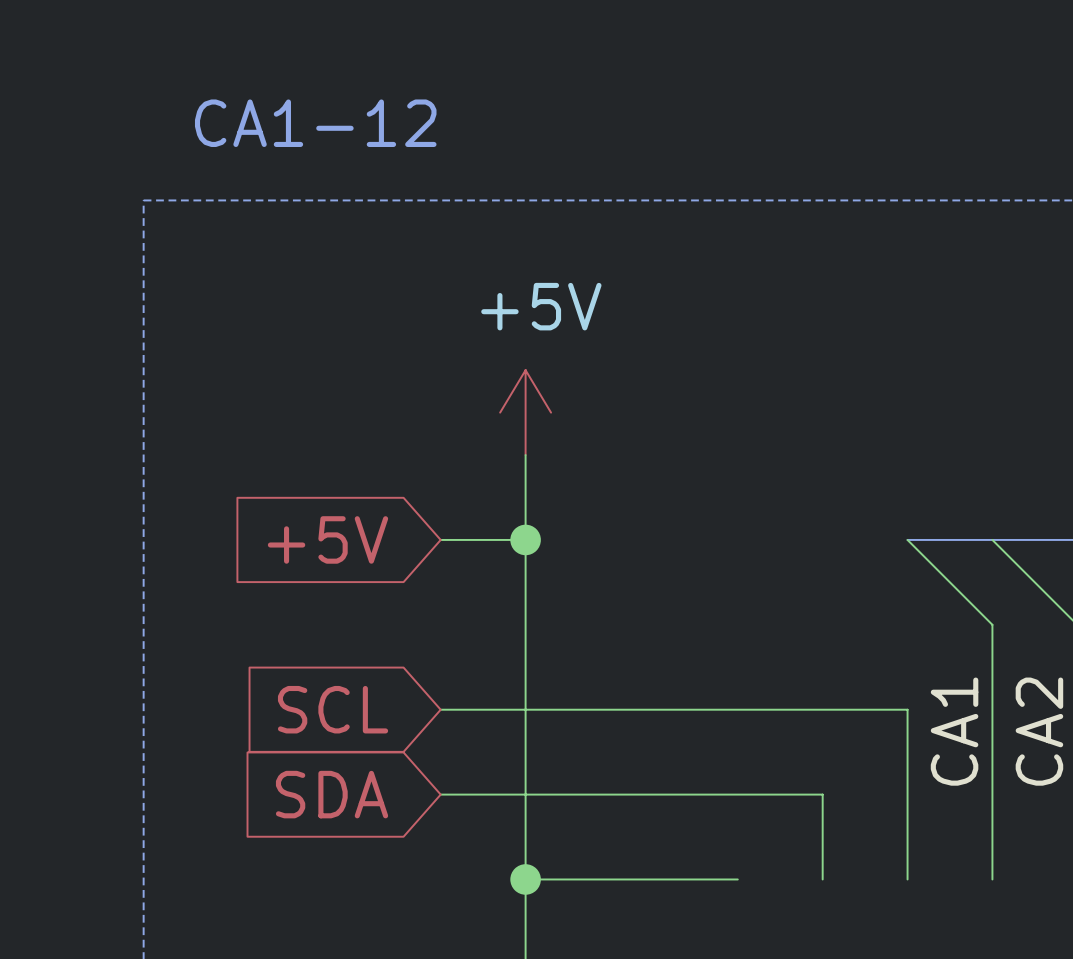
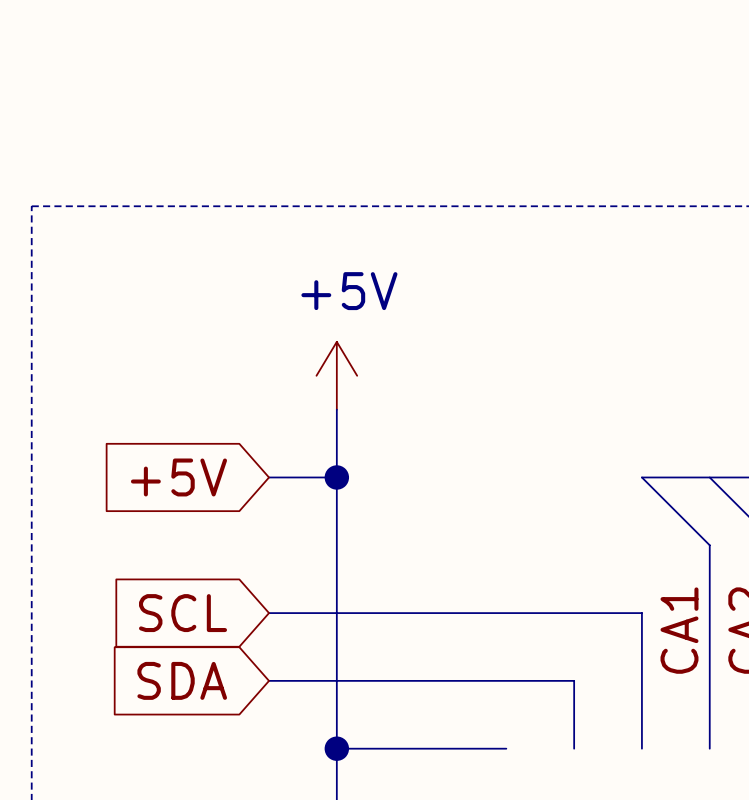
text: CA1-12 (315, 123) -> none

